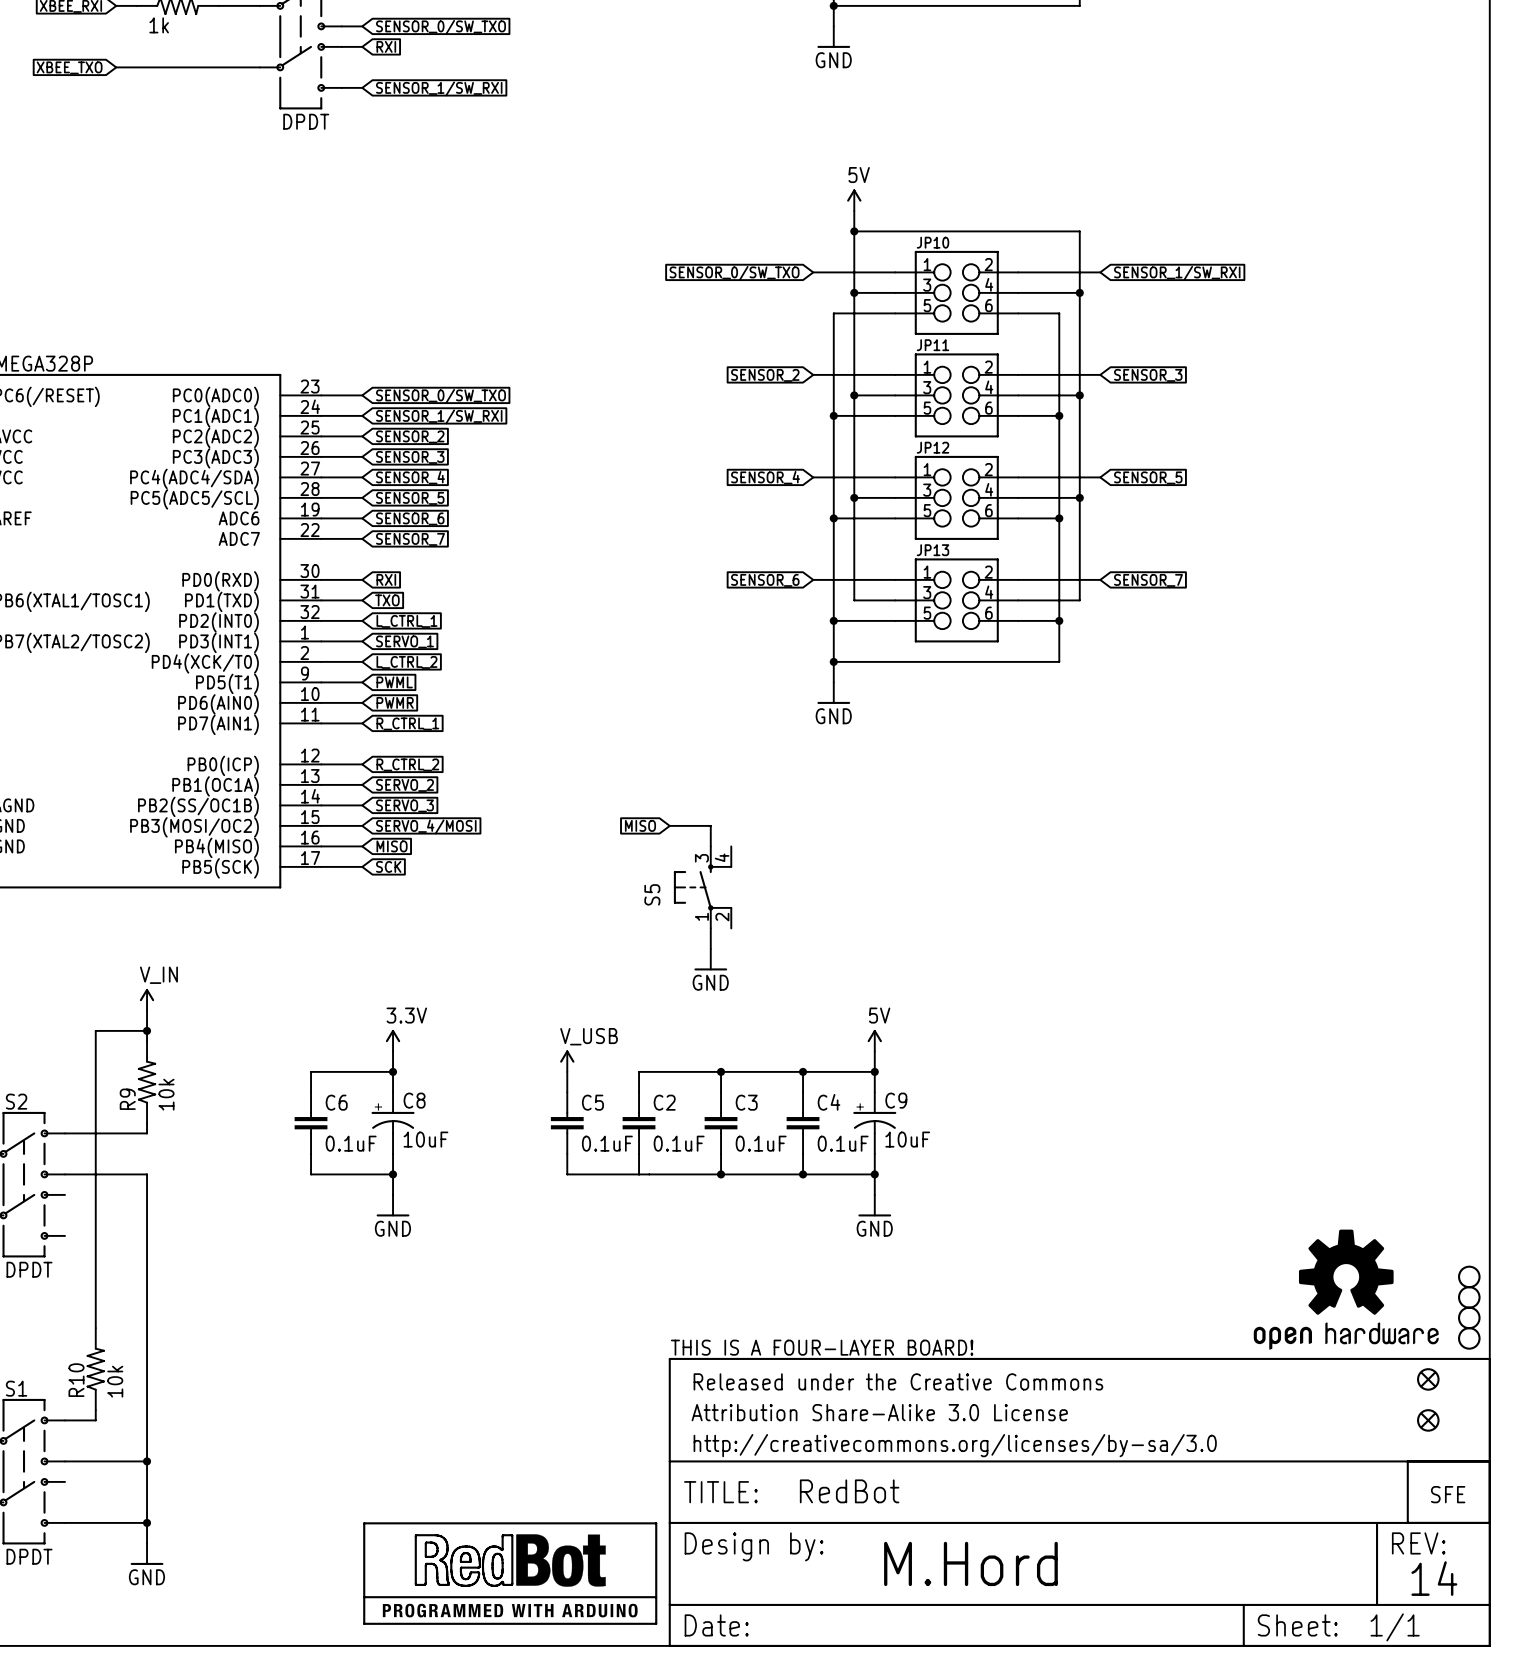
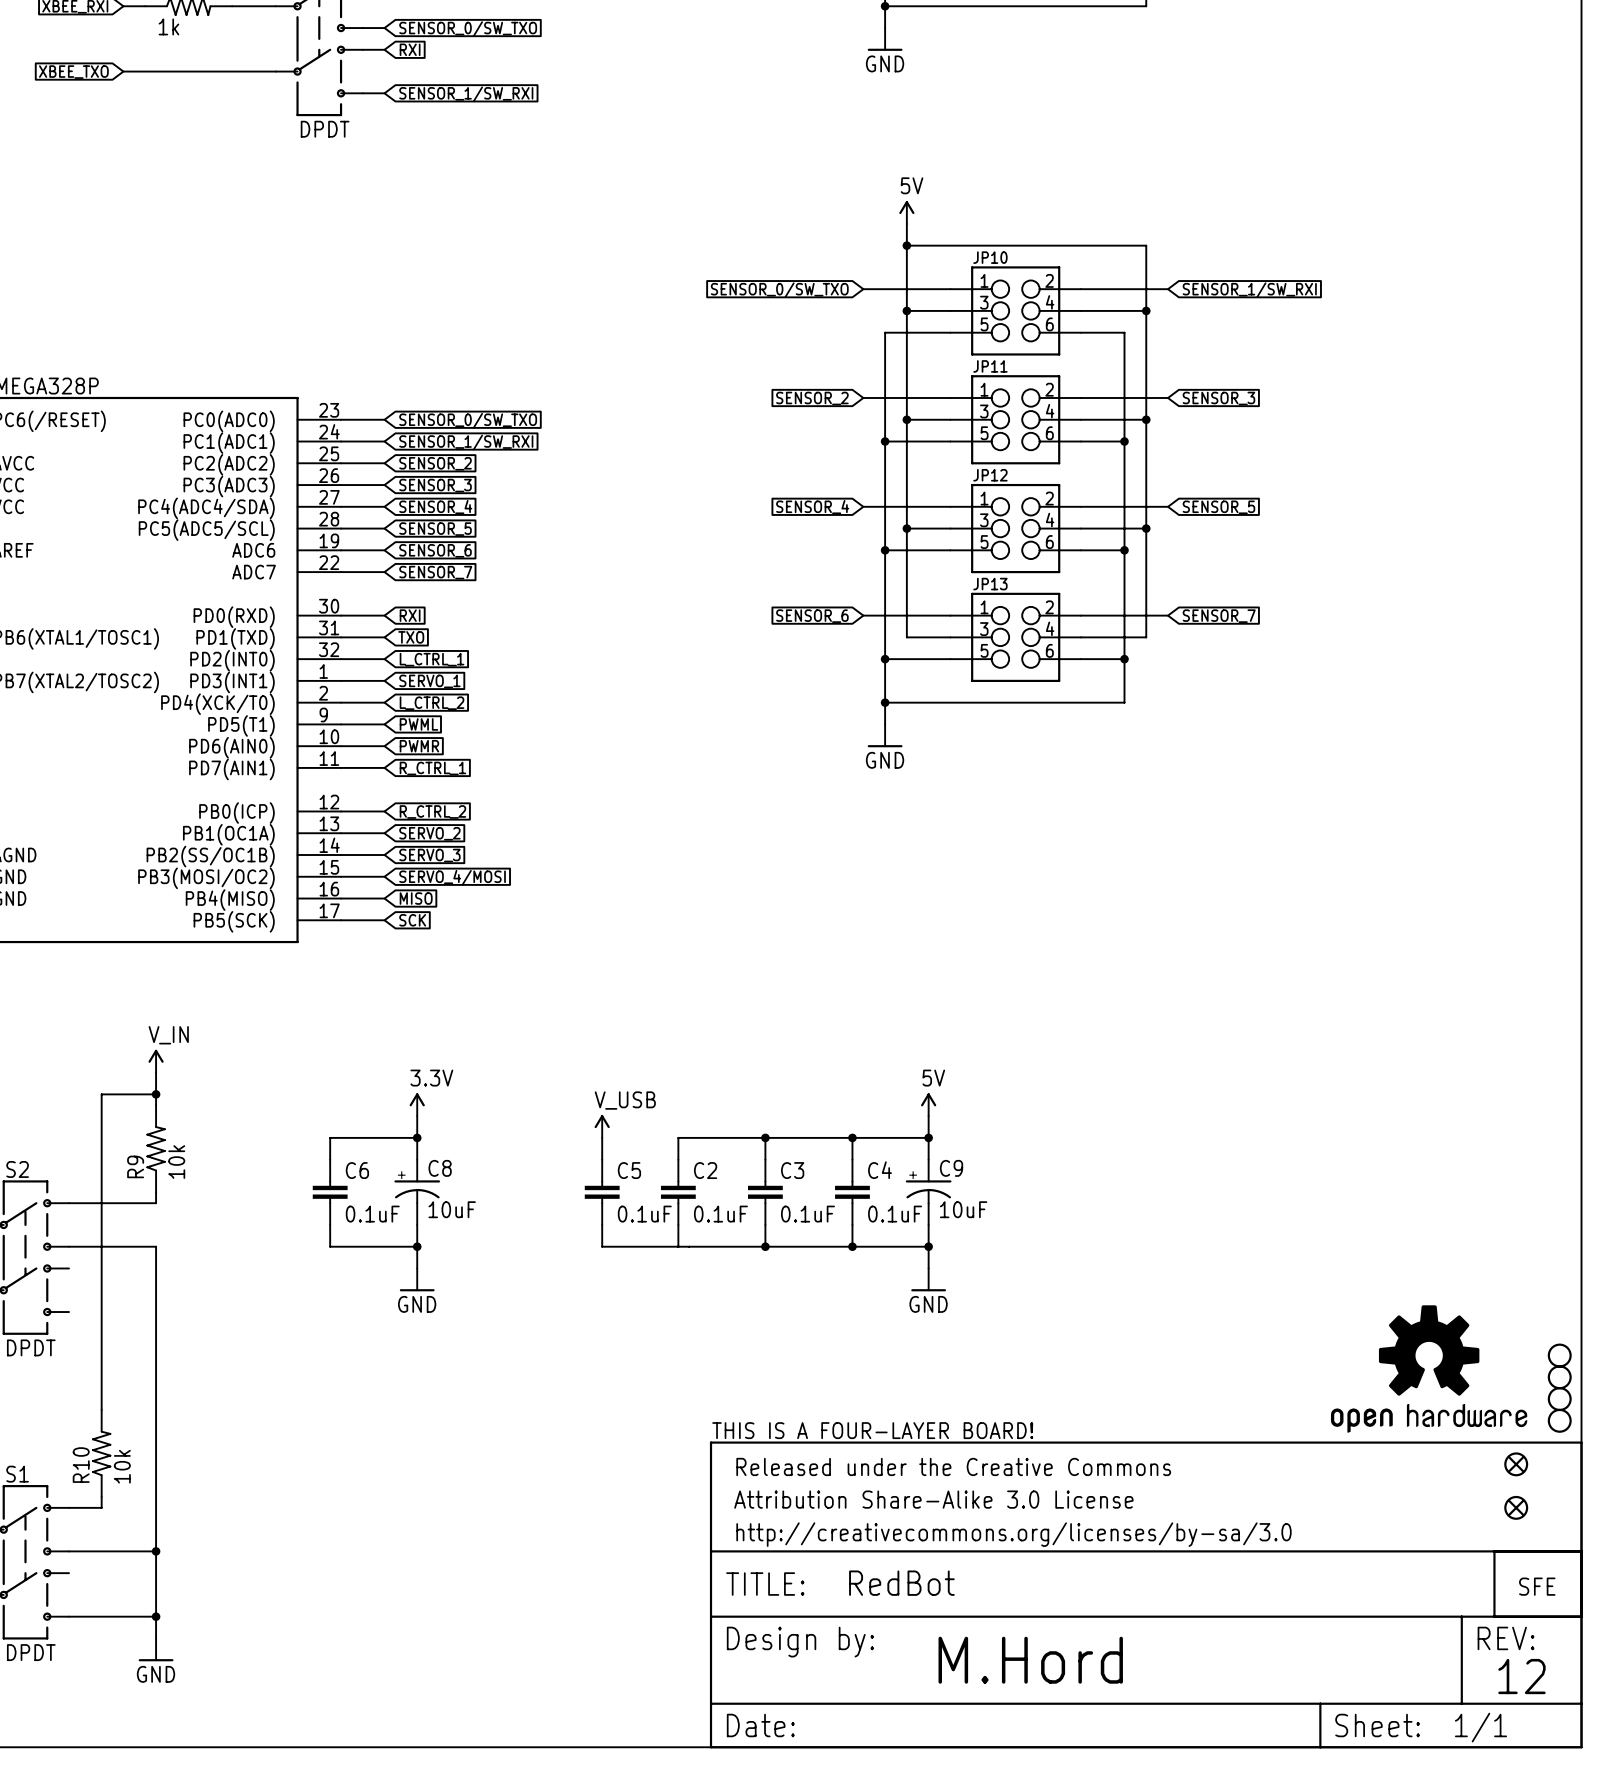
global label: MISO (640, 825) -> none
wire: (669, 825) (710, 825) (710, 846) -> none
S5: (702, 887) -> none
wire: (710, 928) (710, 948) -> none
power symbol: GND (710, 959) -> none
part: (510, 1573) -> none
text: 14 (1434, 1578) -> 12 (1521, 1676)

